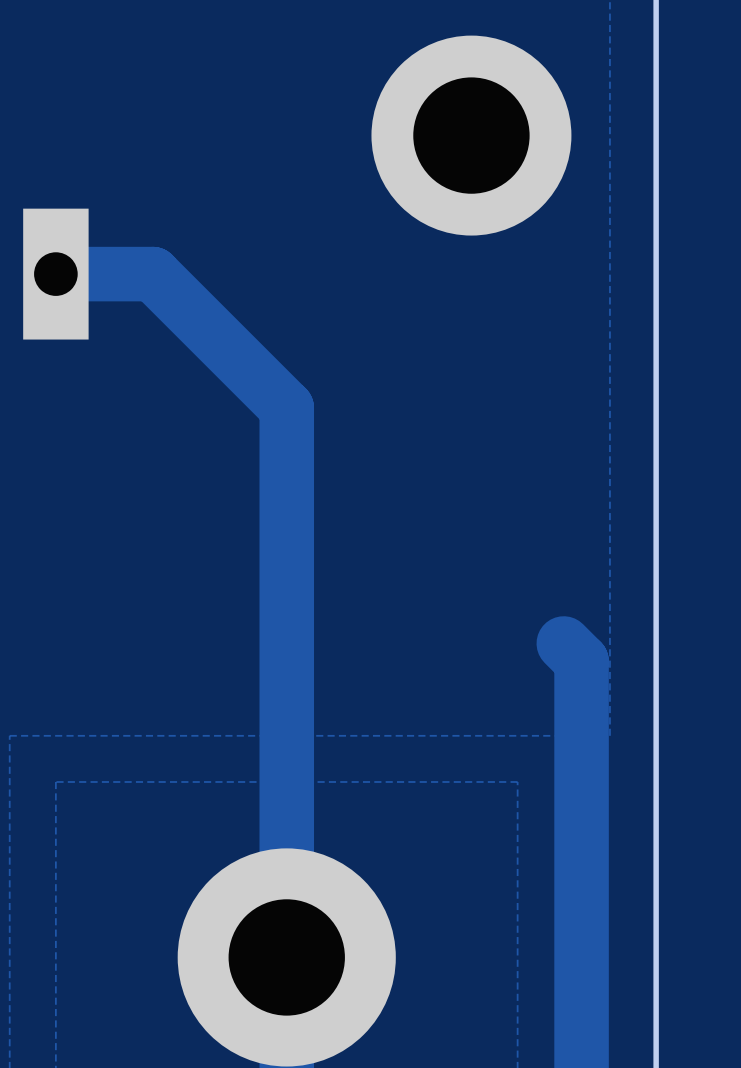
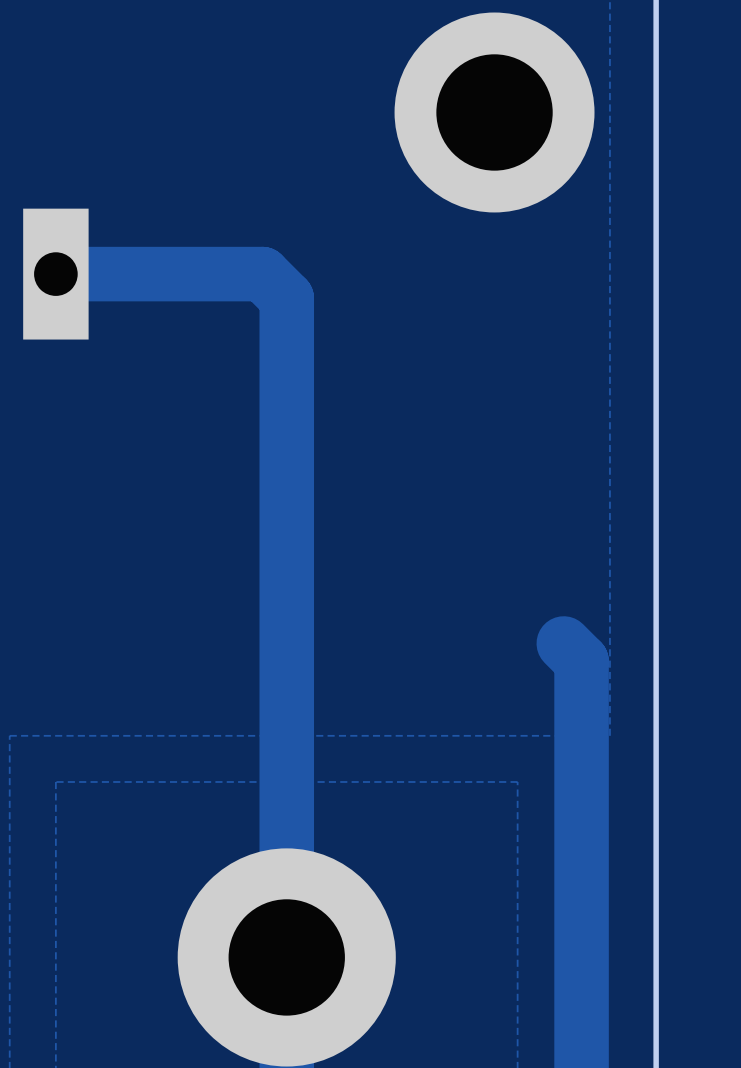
part position: (471, 135) -> (494, 112)
track: (152, 274) (286, 407) -> (152, 274) (262, 274) (286, 298) (286, 407)

